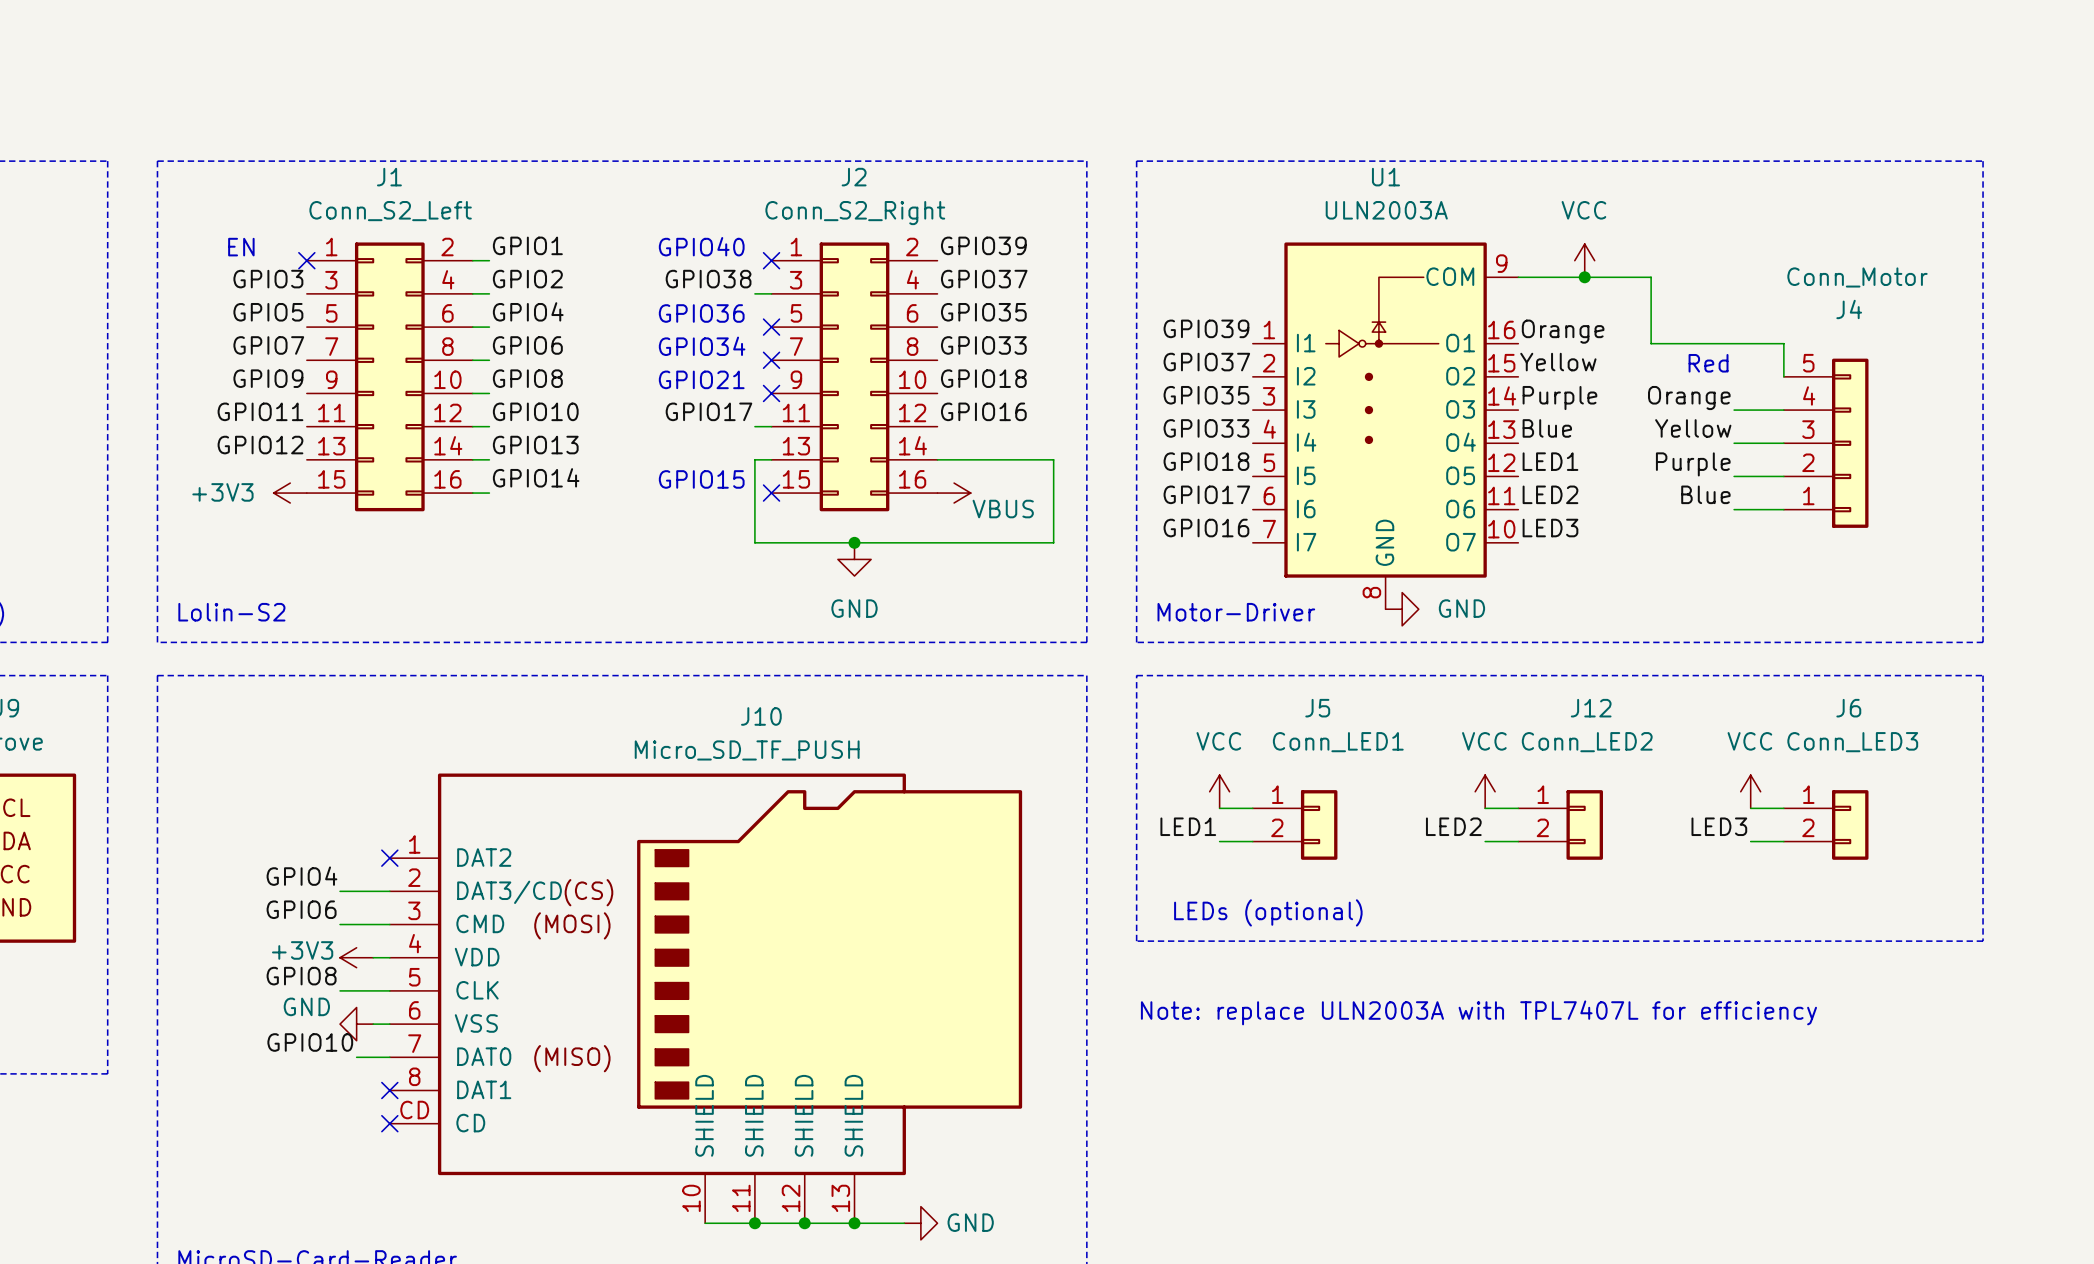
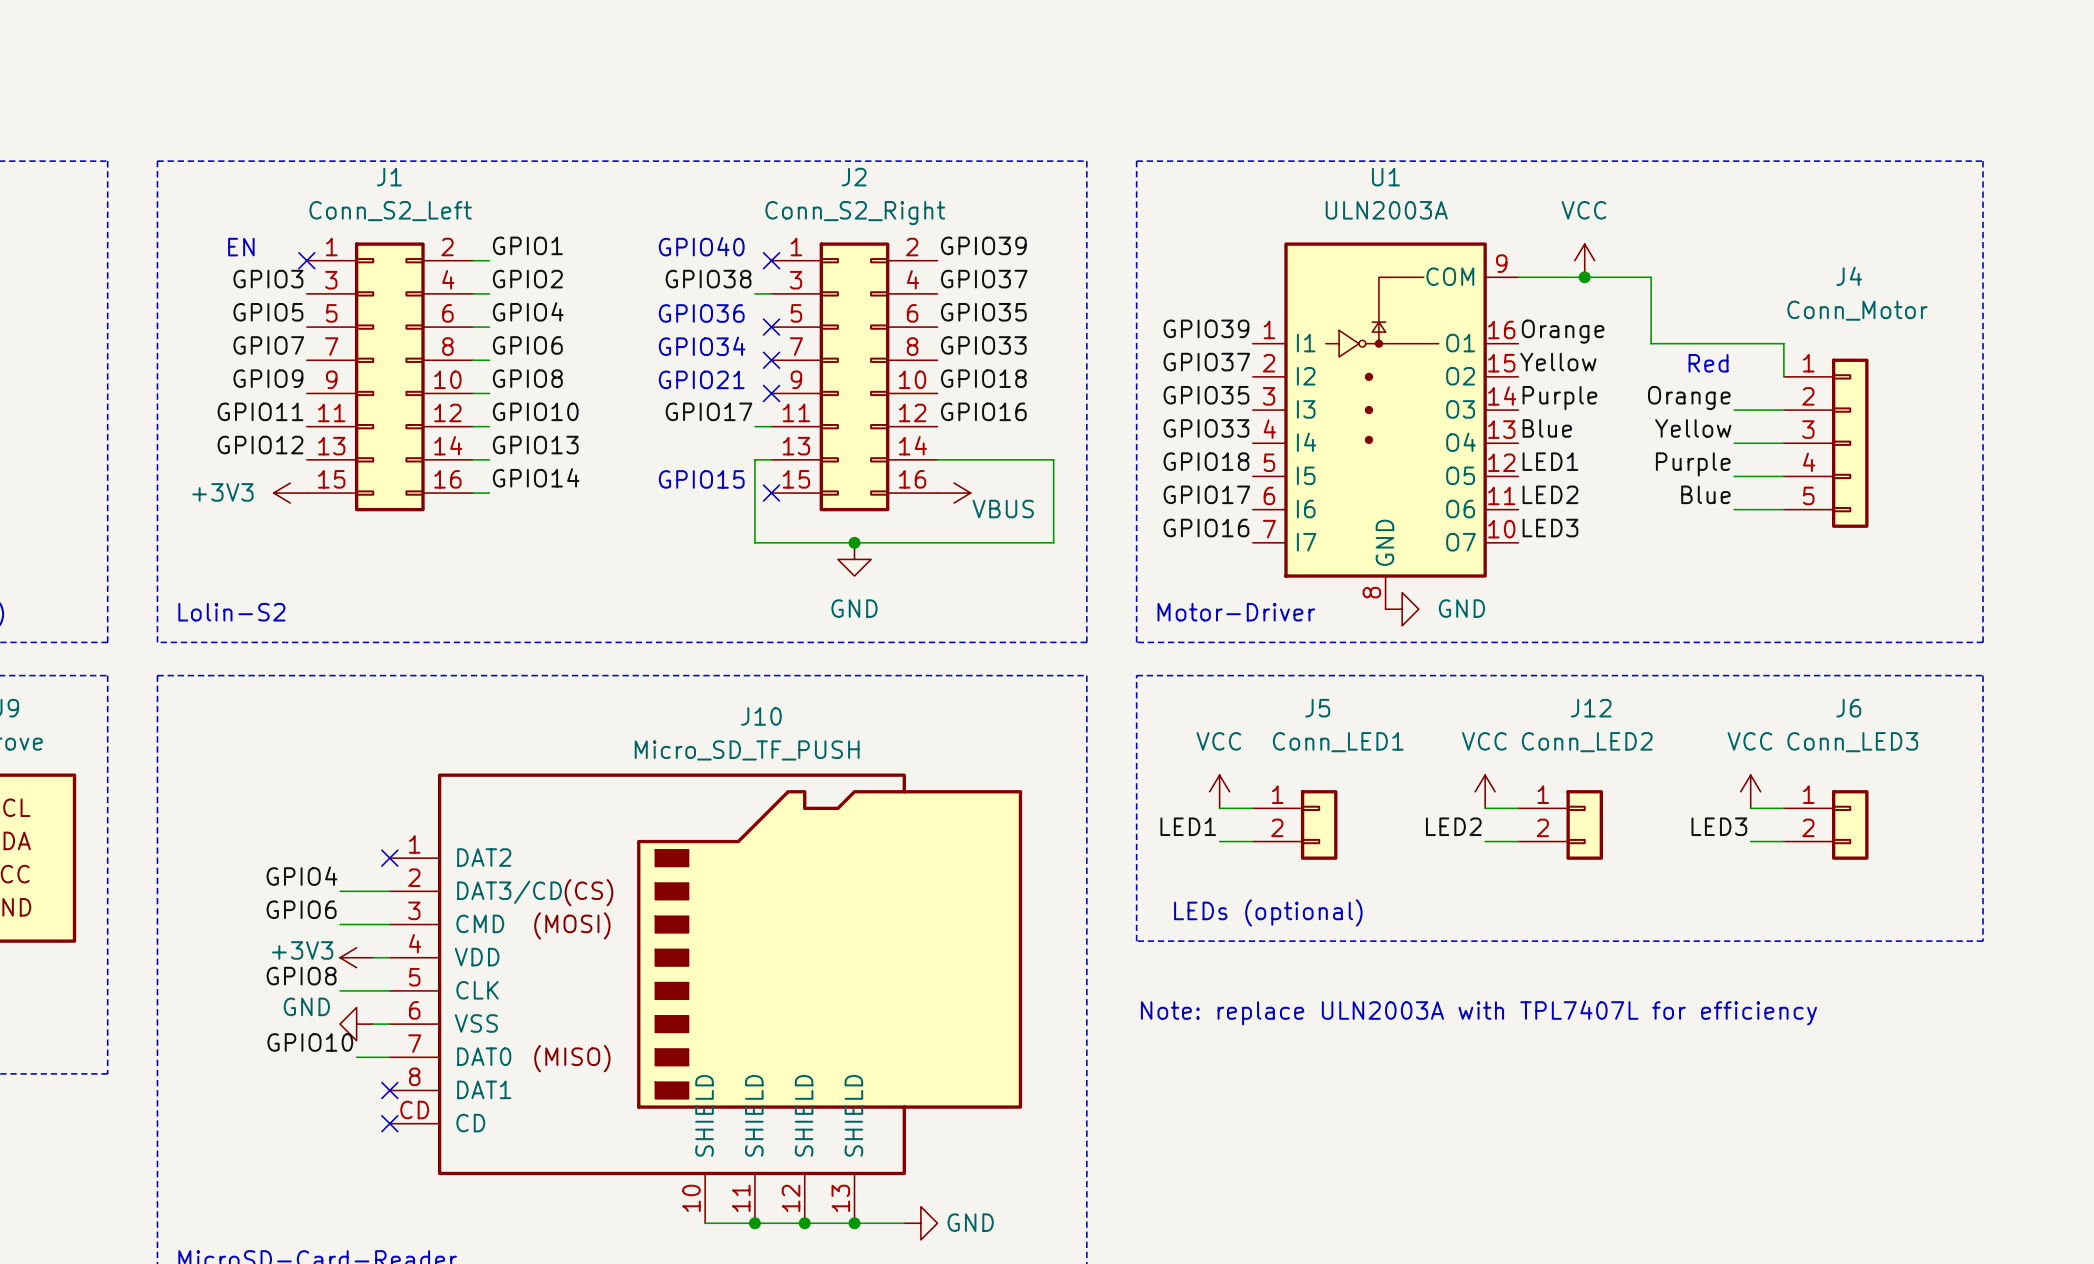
J4 value position: Conn_Motor (1857, 277) -> Conn_Motor (1857, 310)
J4 name position: J4 (1849, 309) -> J4 (1849, 276)
J4 flip: as is (1850, 443) -> up-down (1850, 443)

